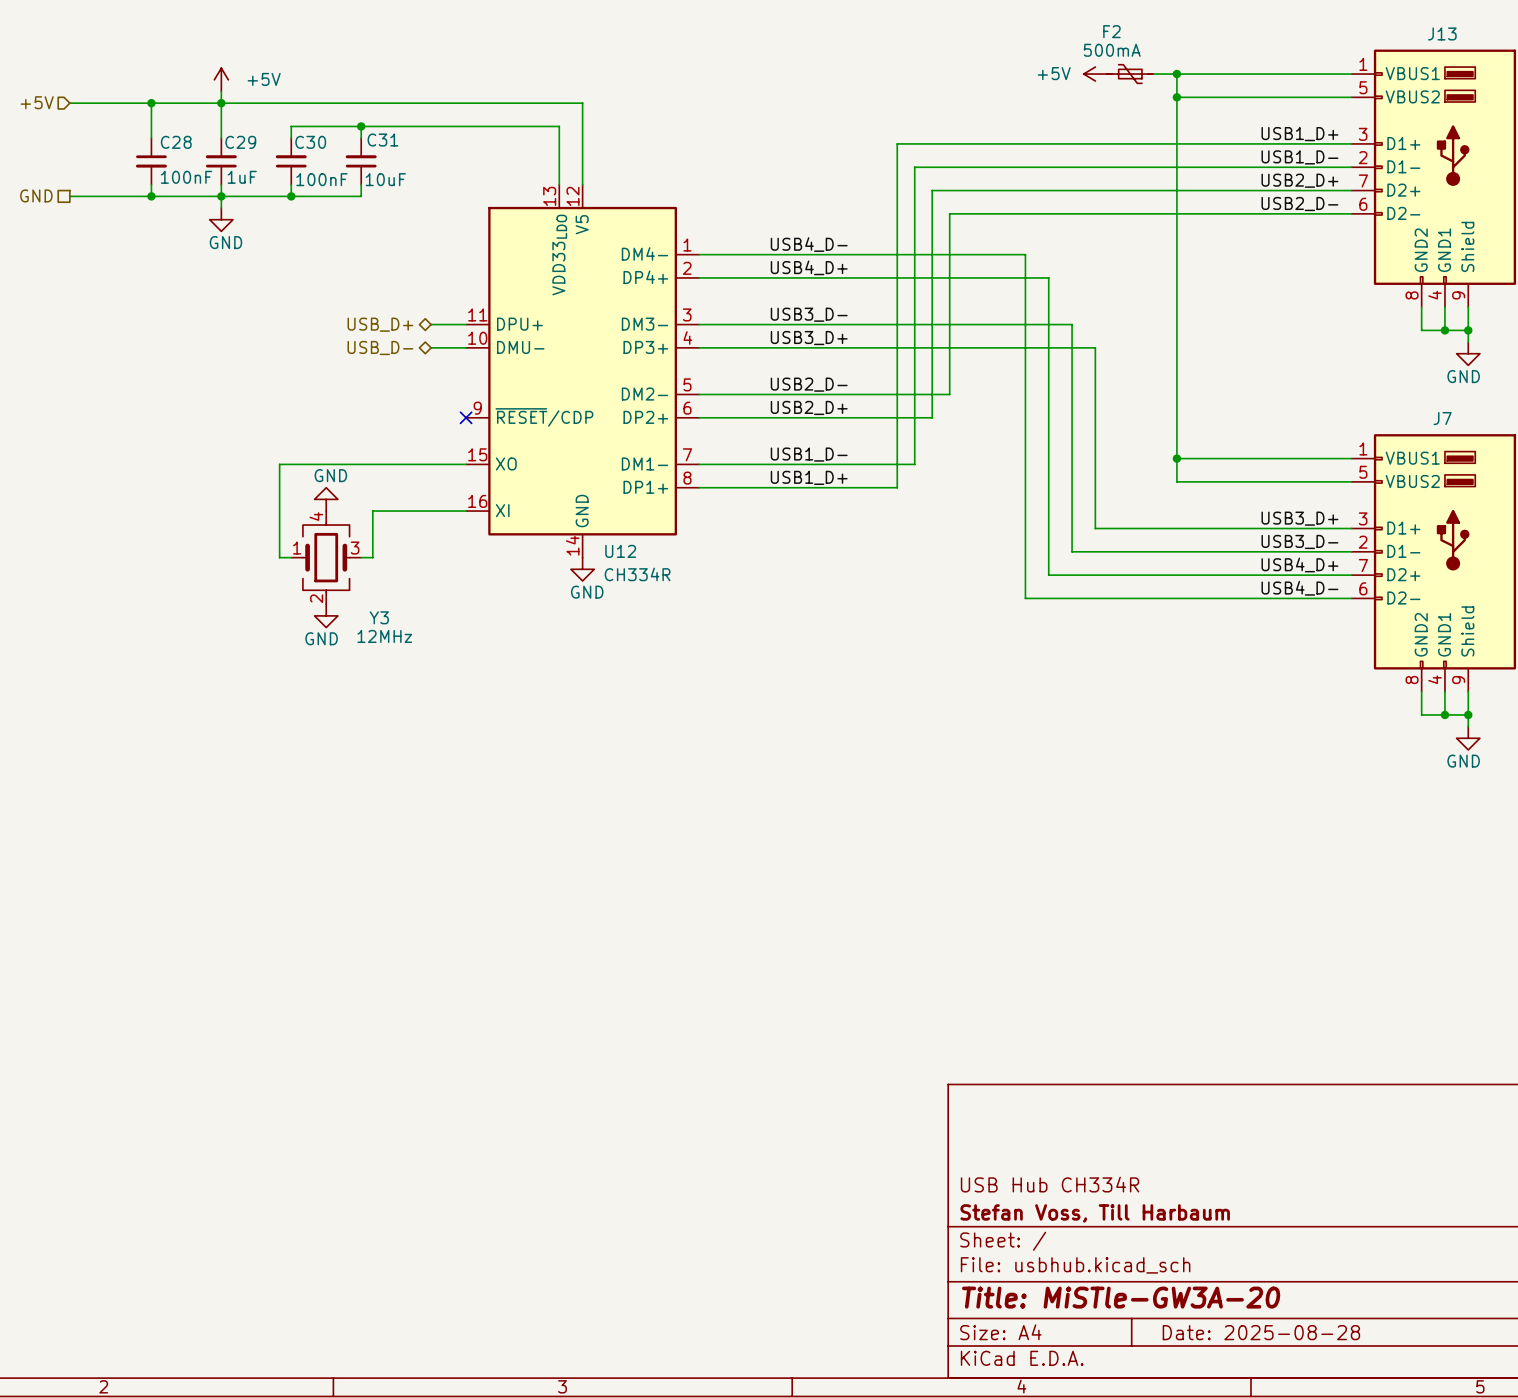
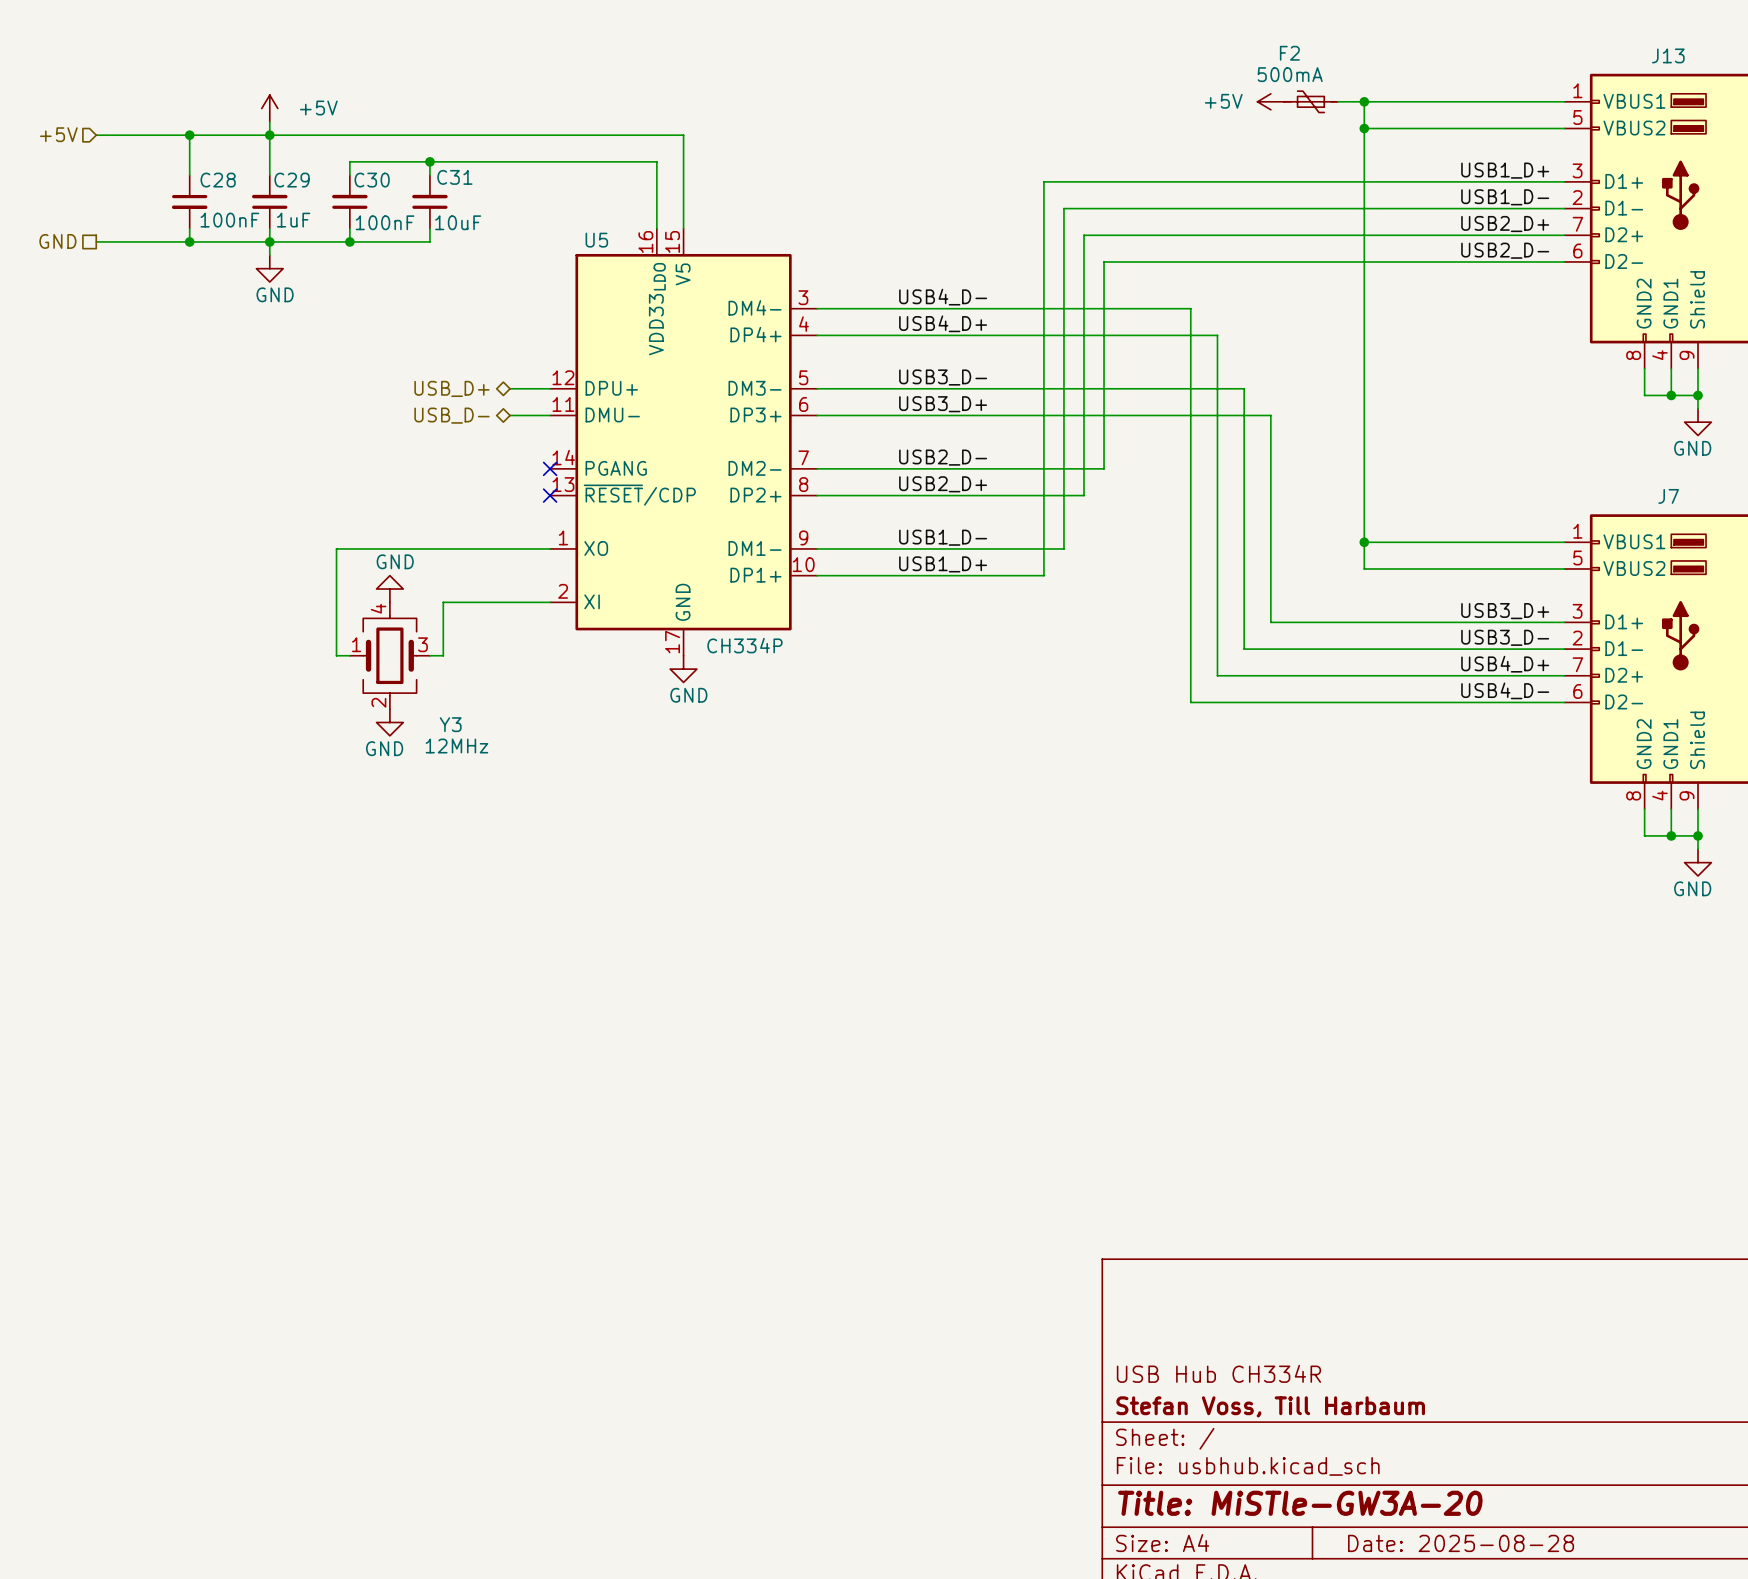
U12: CH334R (582, 371) -> none
U5: none -> CH334P (683, 442)
no-connect mark: none -> (550, 468)

